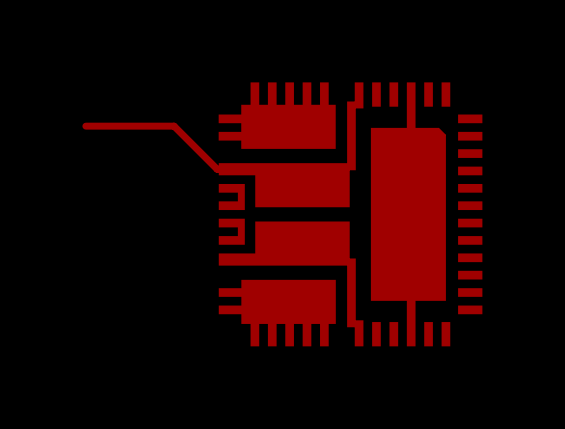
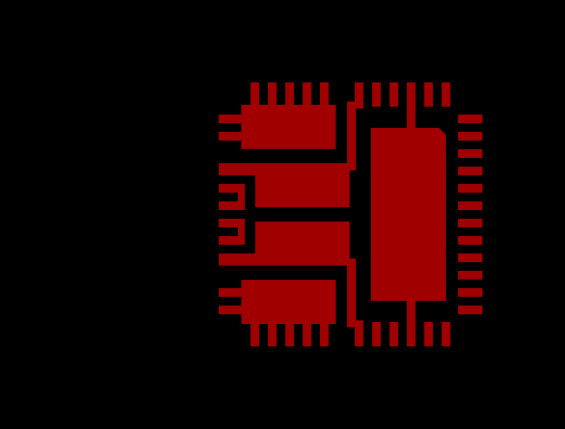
top track: (85, 126) (174, 126) (217, 169) (237, 169) -> none

